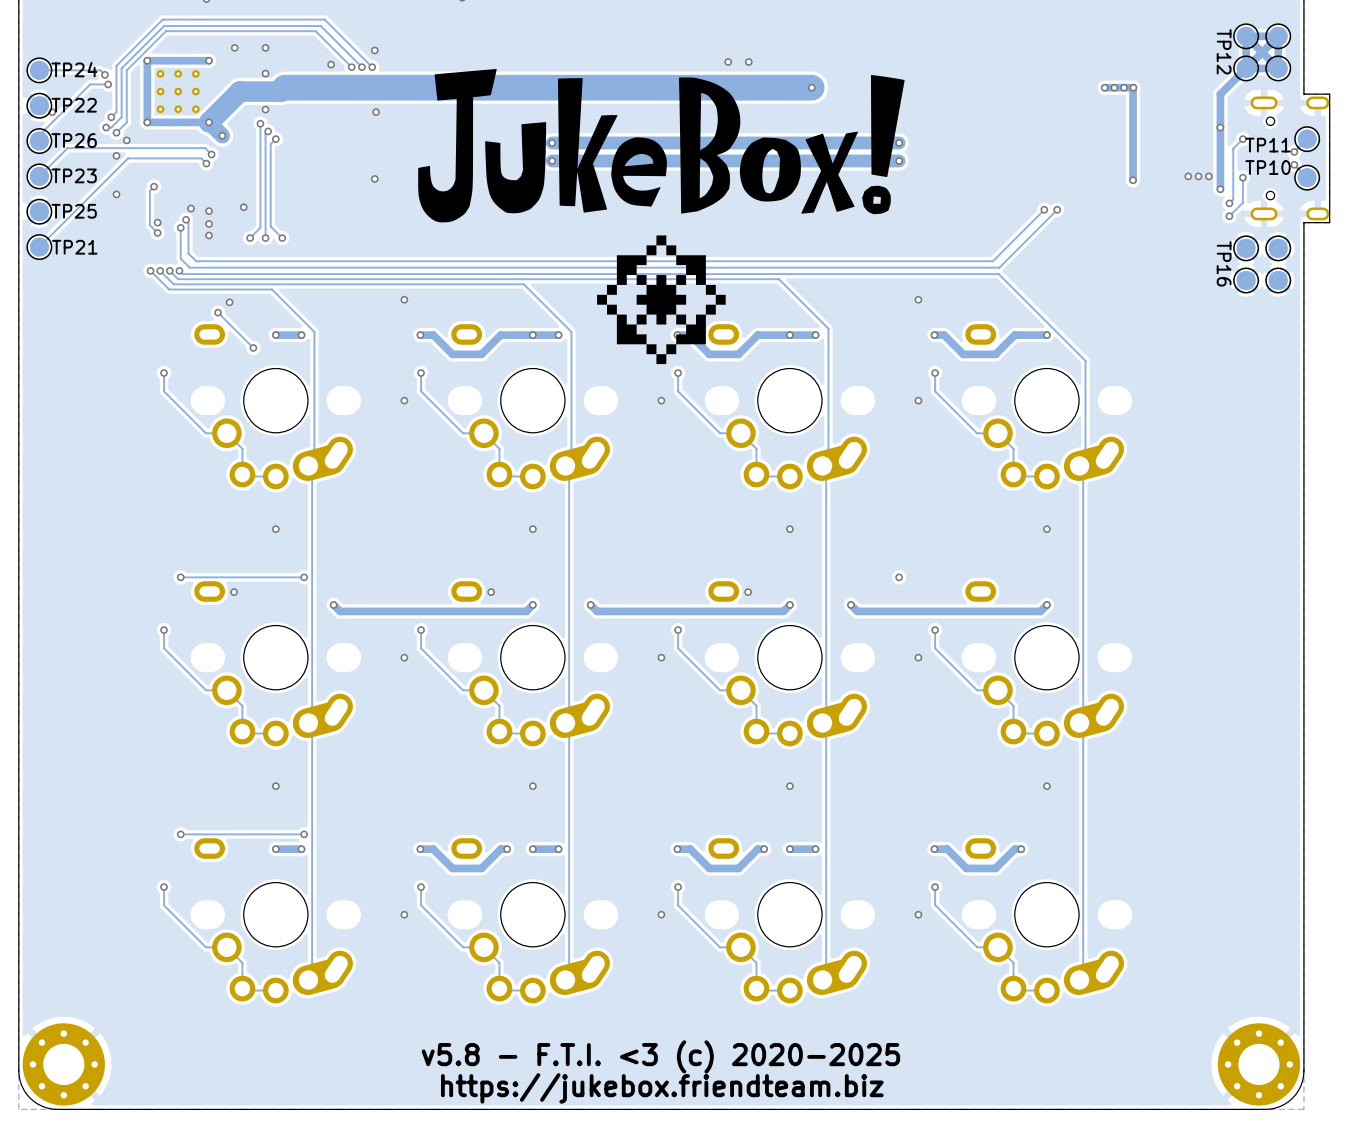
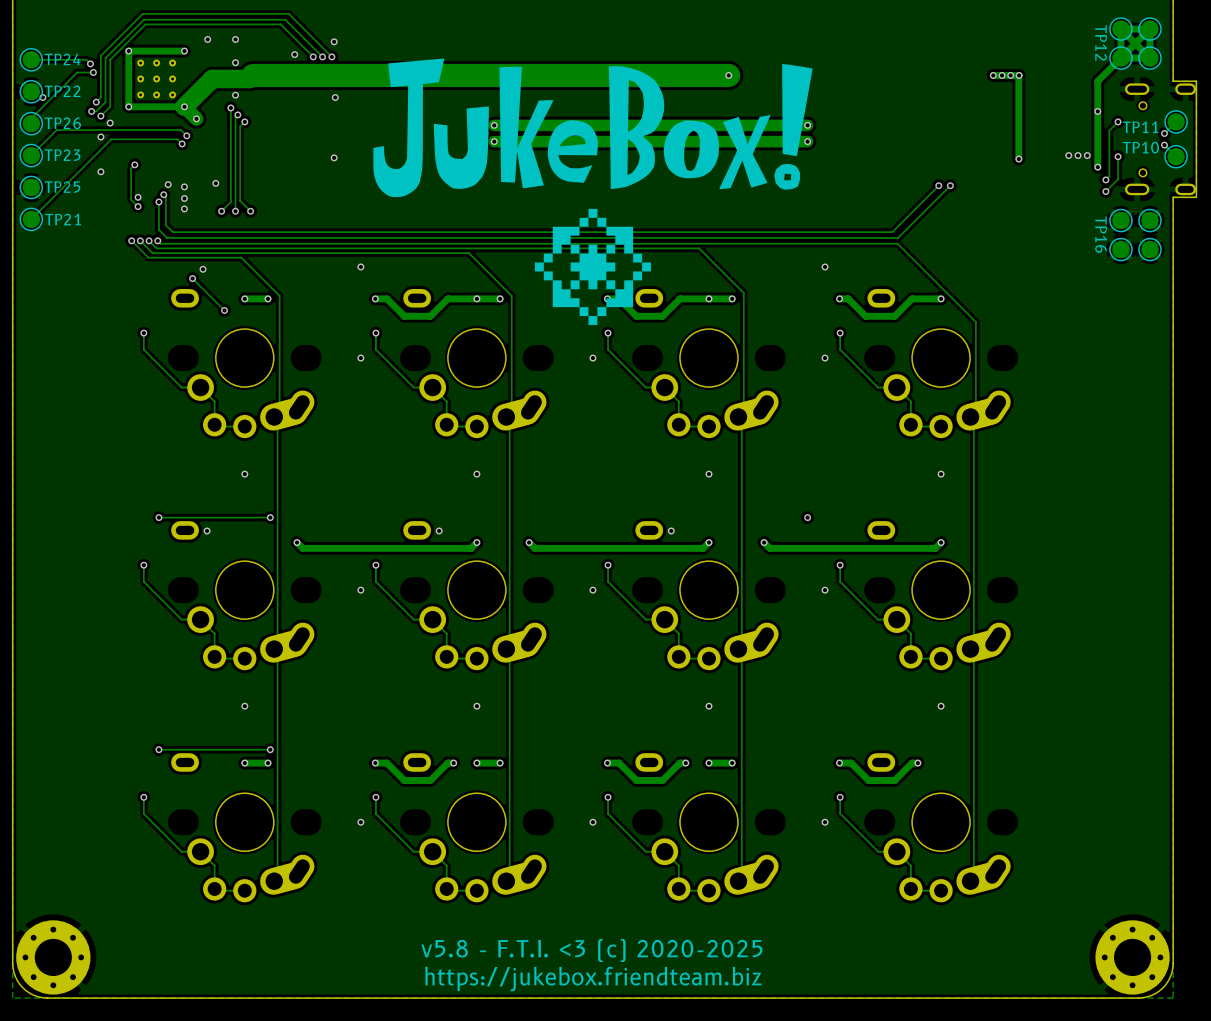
via: (728, 62) -> none
via: (748, 62) -> none

